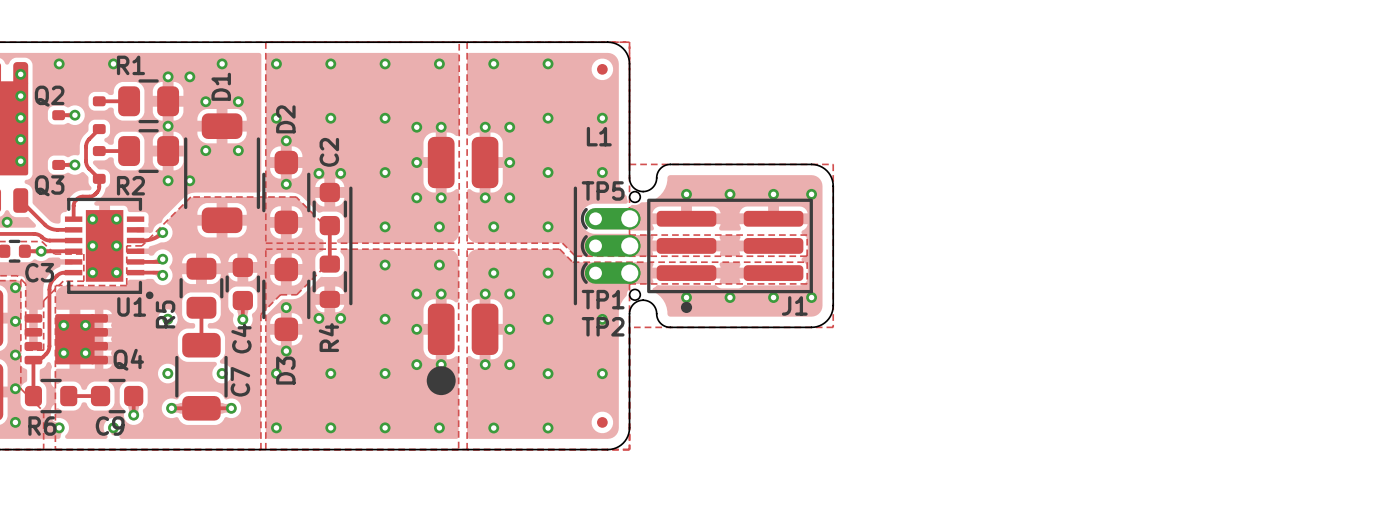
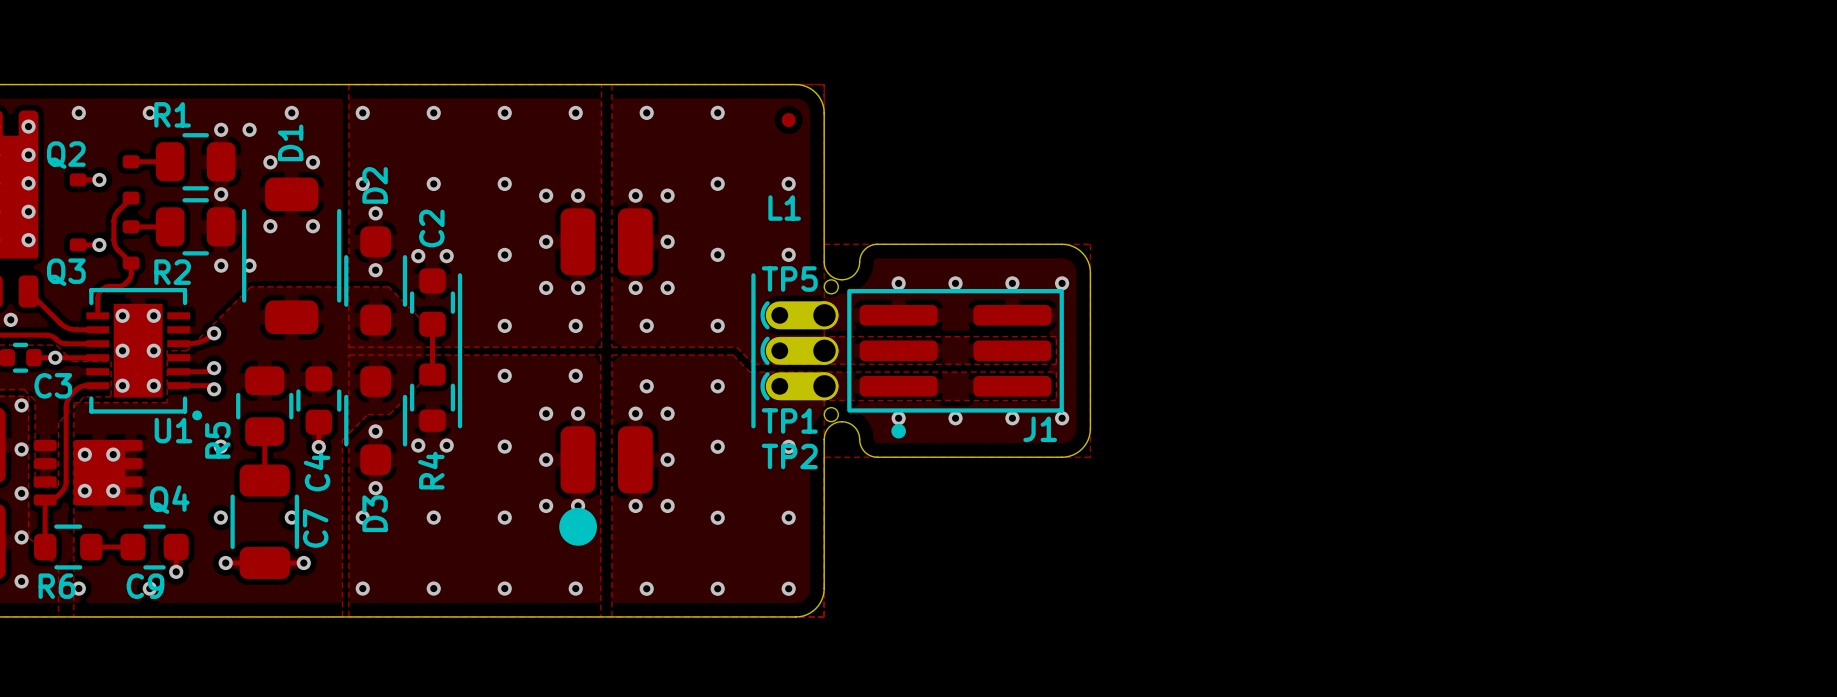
part: (602, 422) -> none
via: none -> (788, 588)

